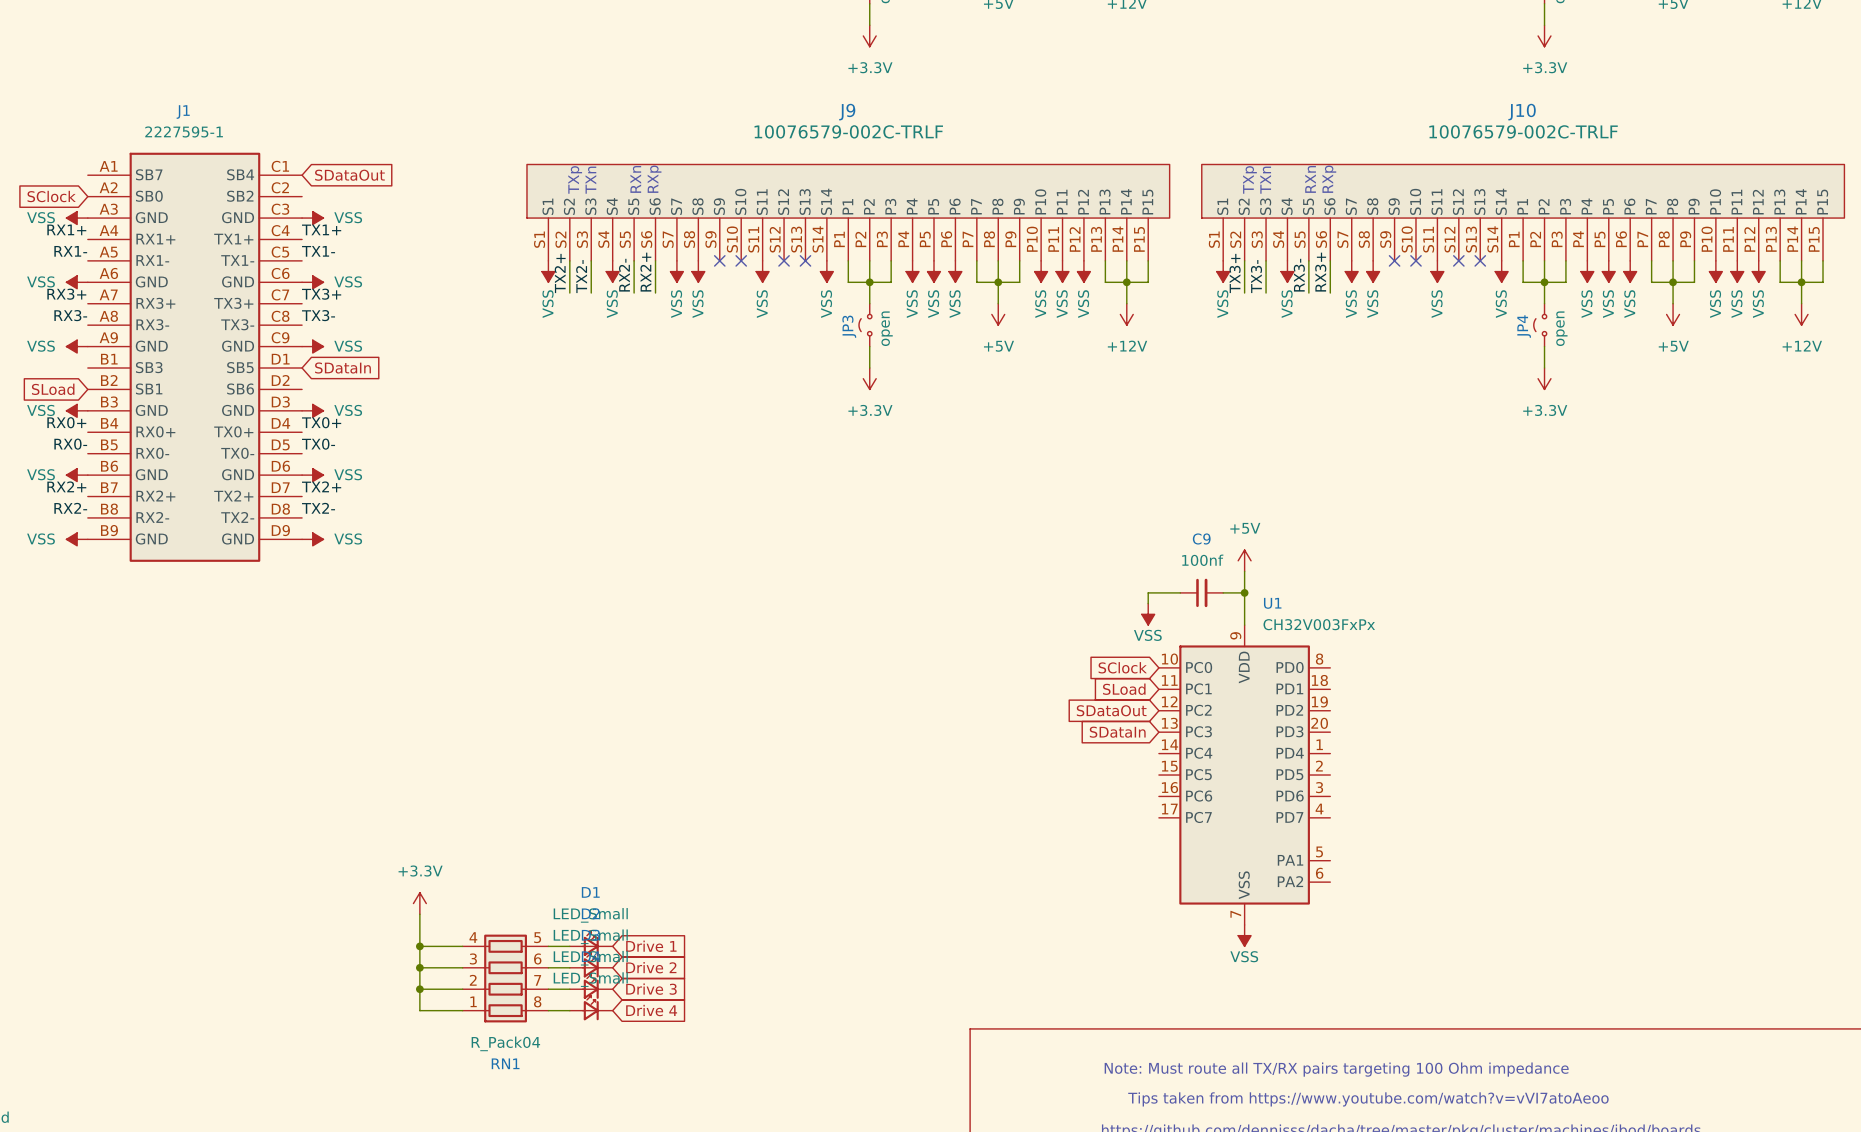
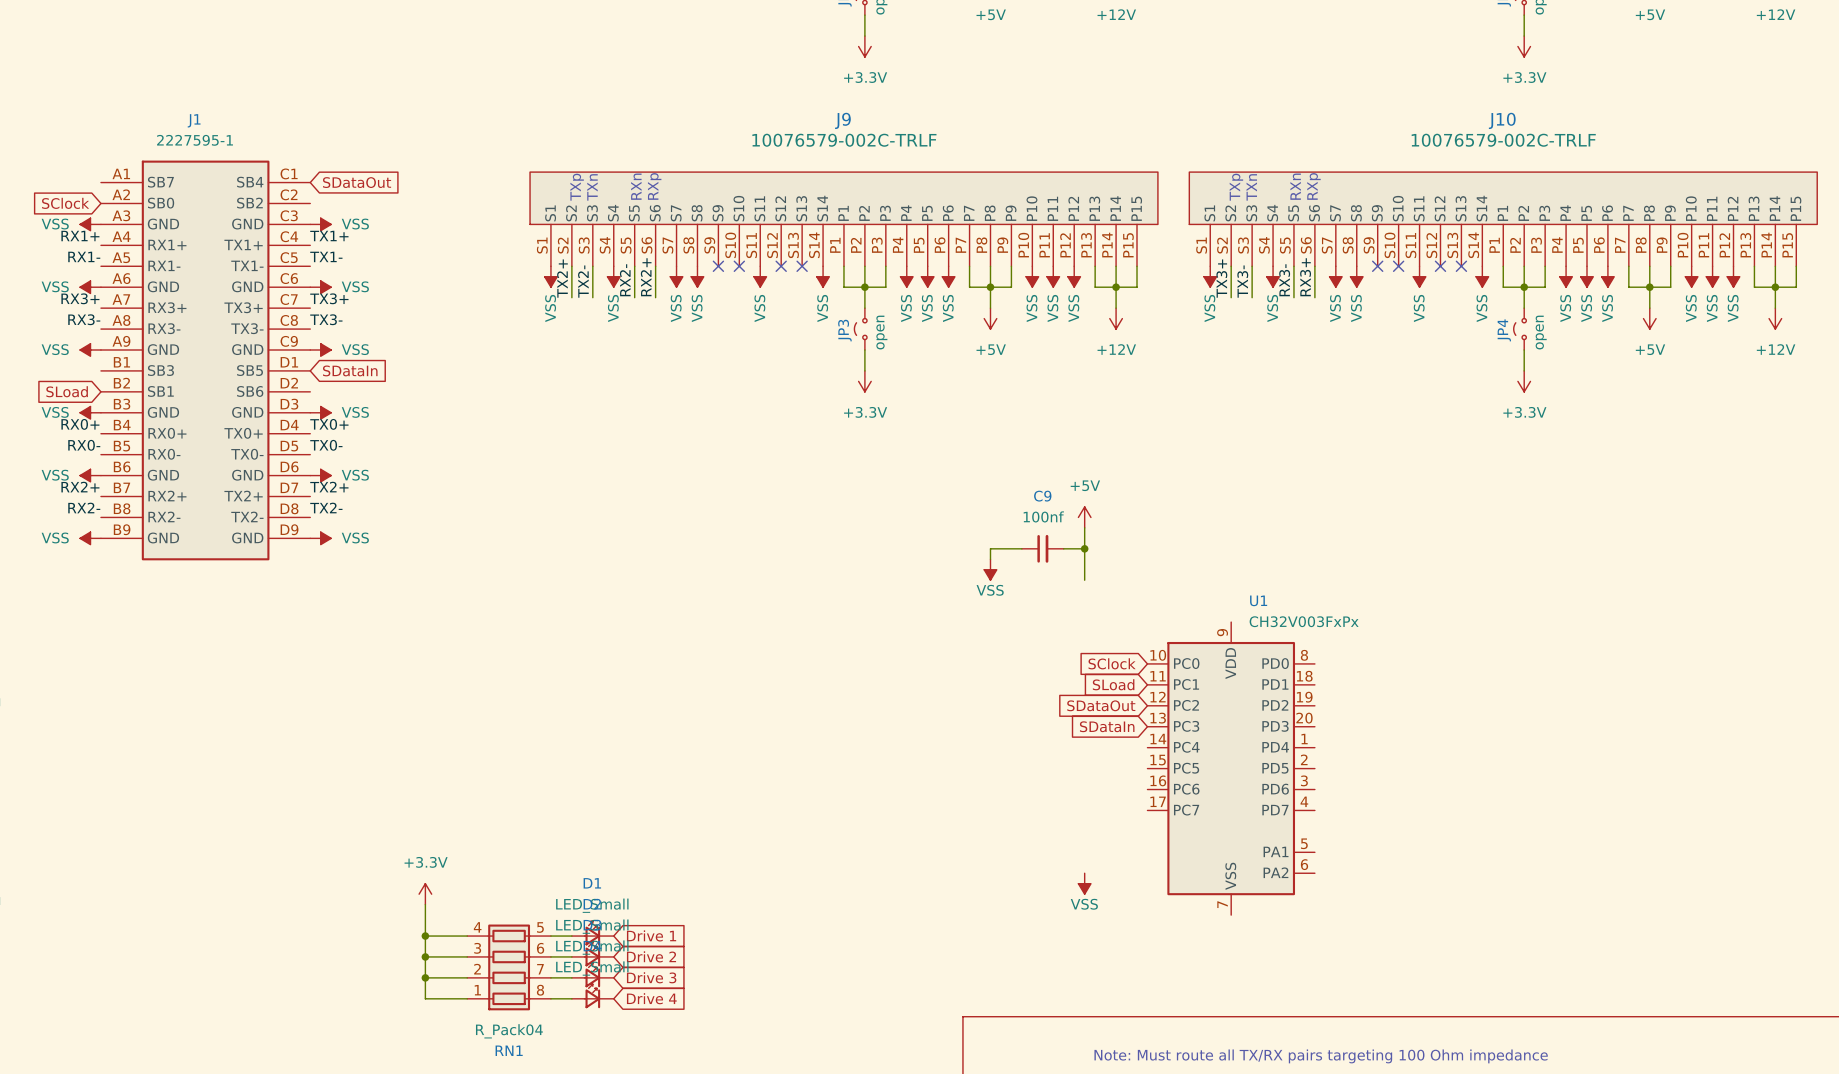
junction: none -> (1084, 548)
power symbol position: +5V (1244, 560) -> +5V (1084, 517)
power symbol: none -> VSS (990, 569)
wire: (1244, 571) (1244, 625) -> (1084, 527) (1084, 580)
wire: (1180, 592) (1148, 592) (1148, 603) -> (1021, 548) (990, 548) (990, 559)
C9 position: (1201, 592) -> (1042, 548)
wire: (1223, 592) (1244, 592) -> (1063, 548) (1084, 548)
junction: (1244, 592) -> none
power symbol: VSS (1148, 614) -> none
power symbol: none -> VSS (1084, 883)
power symbol: VSS (1244, 935) -> none

